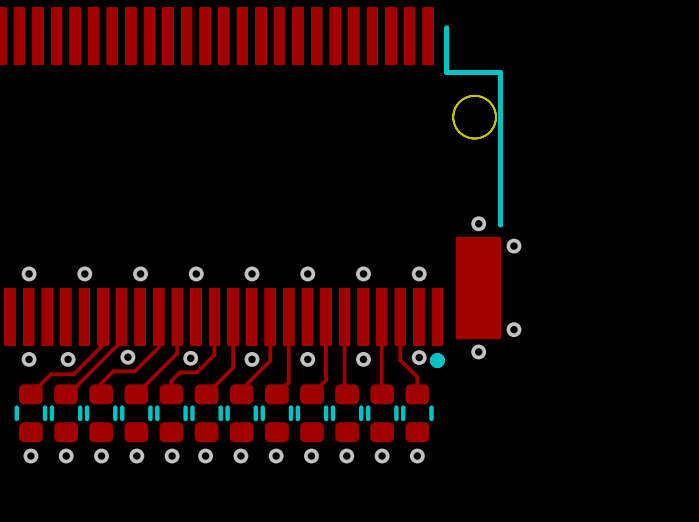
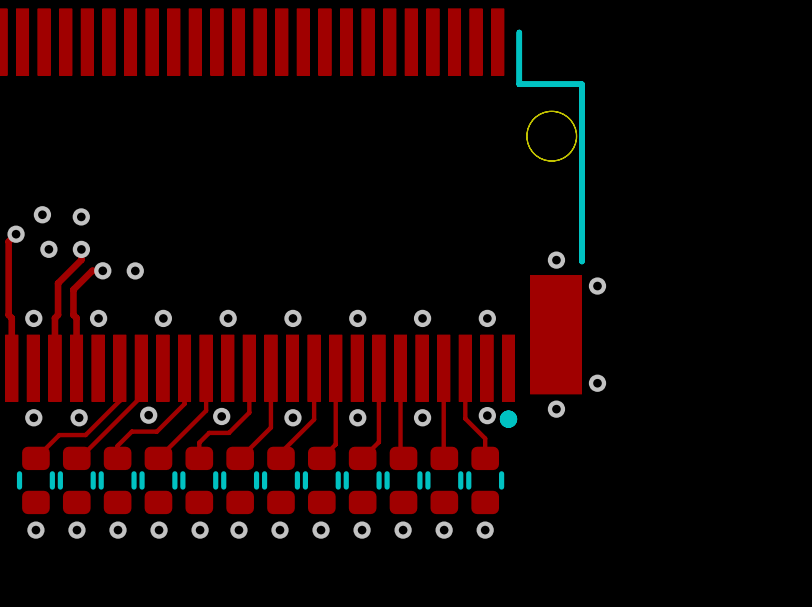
via: none -> (42, 214)
via: none -> (81, 216)
top track: none -> (16, 234) (8, 241) (8, 314) (11, 318) (11, 368)
via: none -> (16, 234)
via: none -> (48, 249)
top track: none -> (81, 249) (81, 259) (58, 283) (58, 314) (54, 318) (54, 368)
via: none -> (81, 249)
top track: none -> (102, 270) (92, 270) (73, 289) (73, 314) (76, 318) (76, 368)
via: none -> (102, 270)
via: none -> (135, 270)

